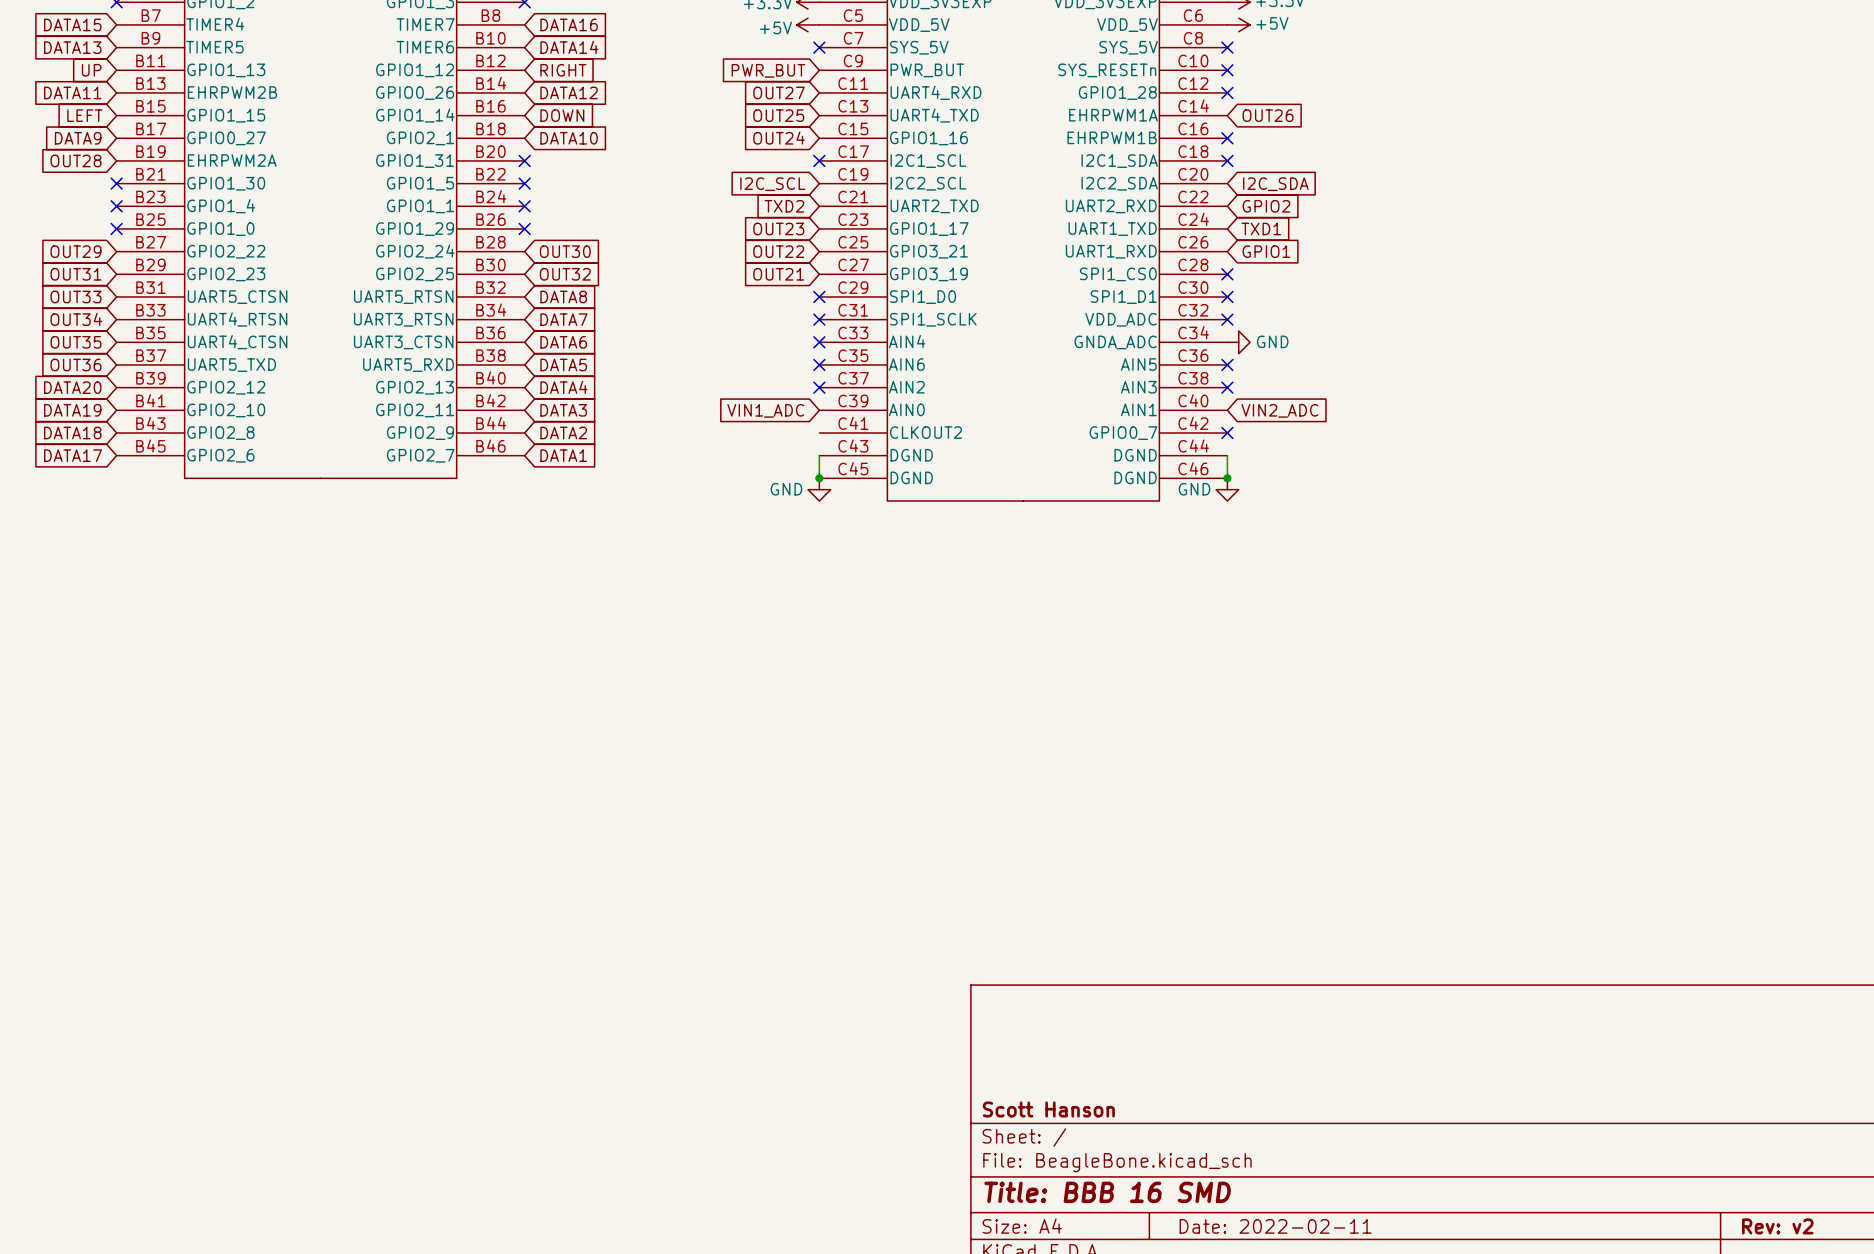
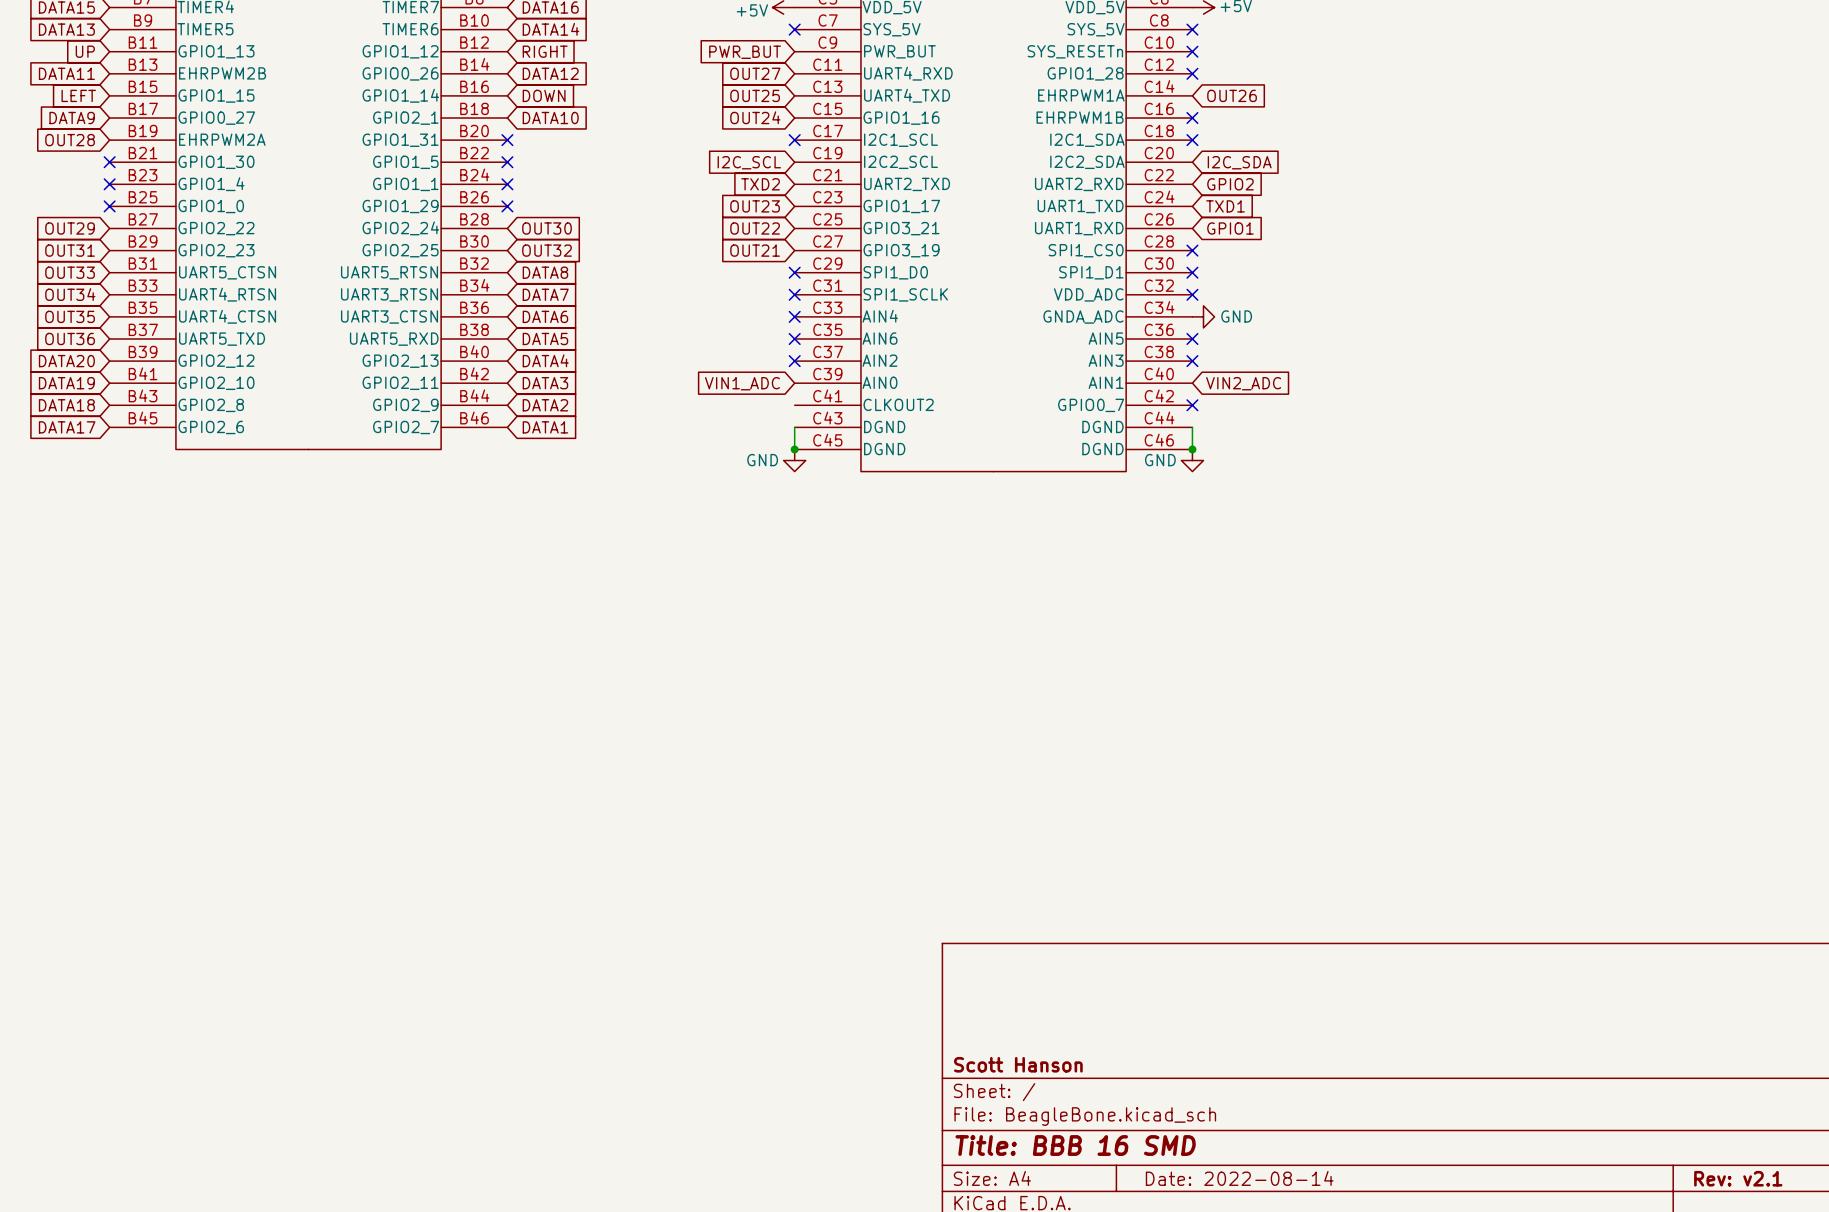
title block: Date: 2022-02-11 (1275, 1226) -> Date: 2022-08-14 (1239, 1178)
title block: Rev: v2 (1777, 1226) -> Rev: v2.1 (1738, 1178)

